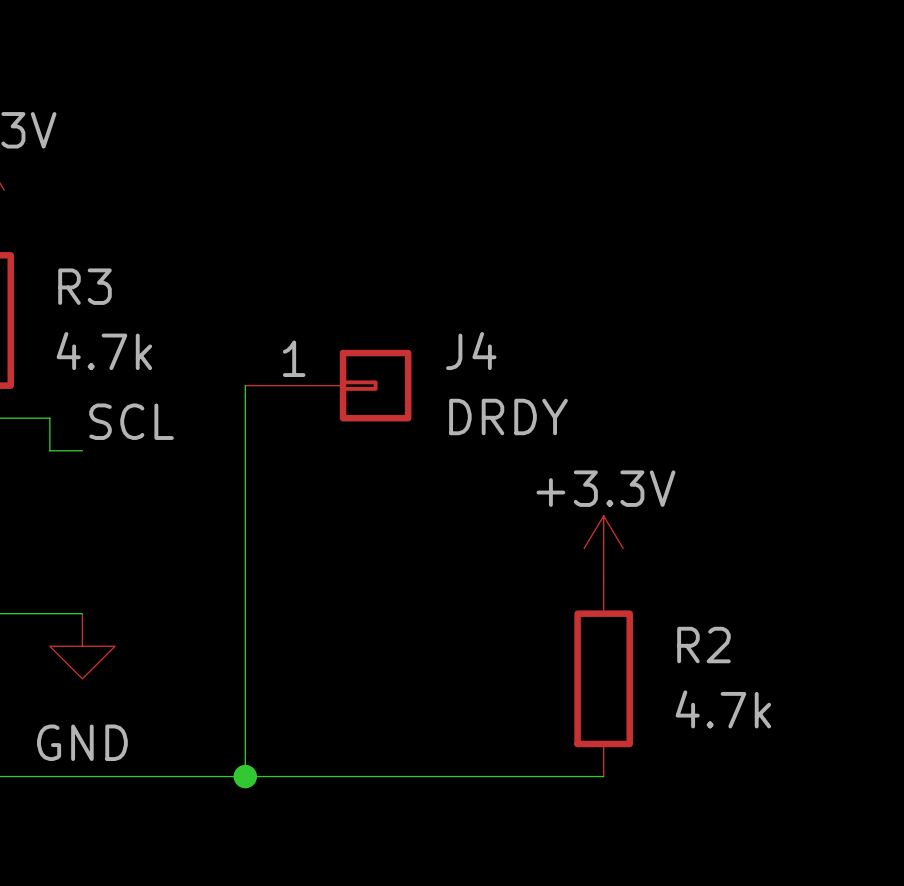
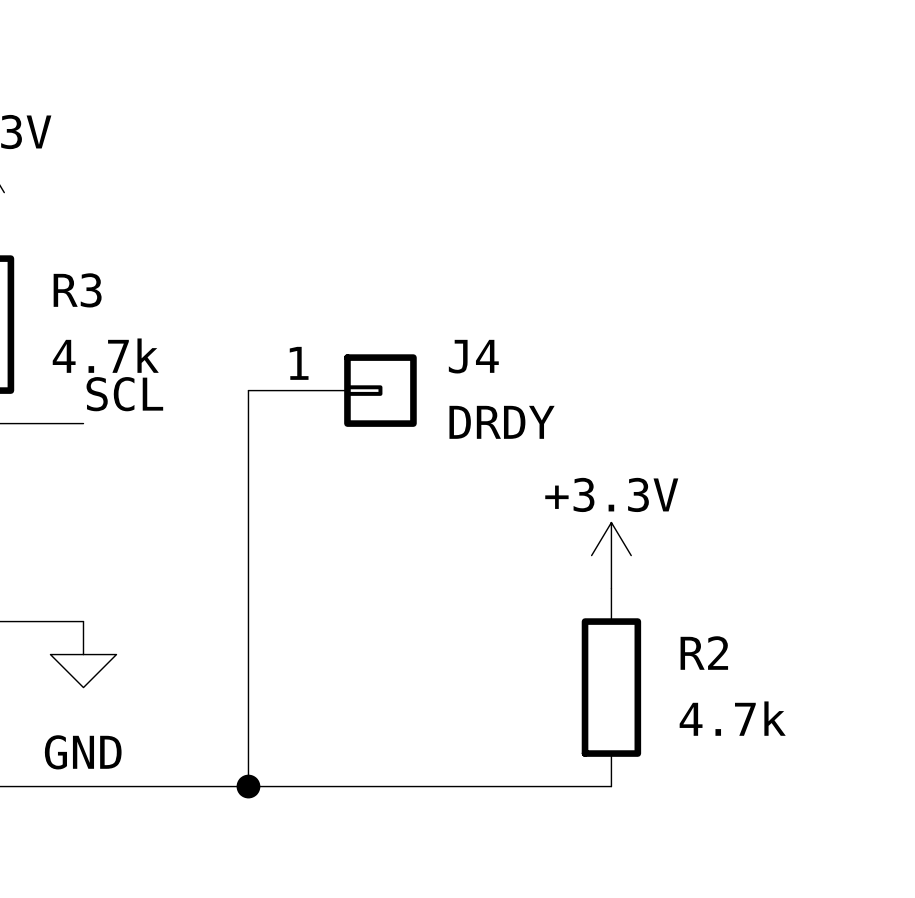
wire: (49, 418) (49, 450) (82, 450) -> (50, 423) (83, 423)
label position: SCL (131, 421) -> SCL (124, 394)

